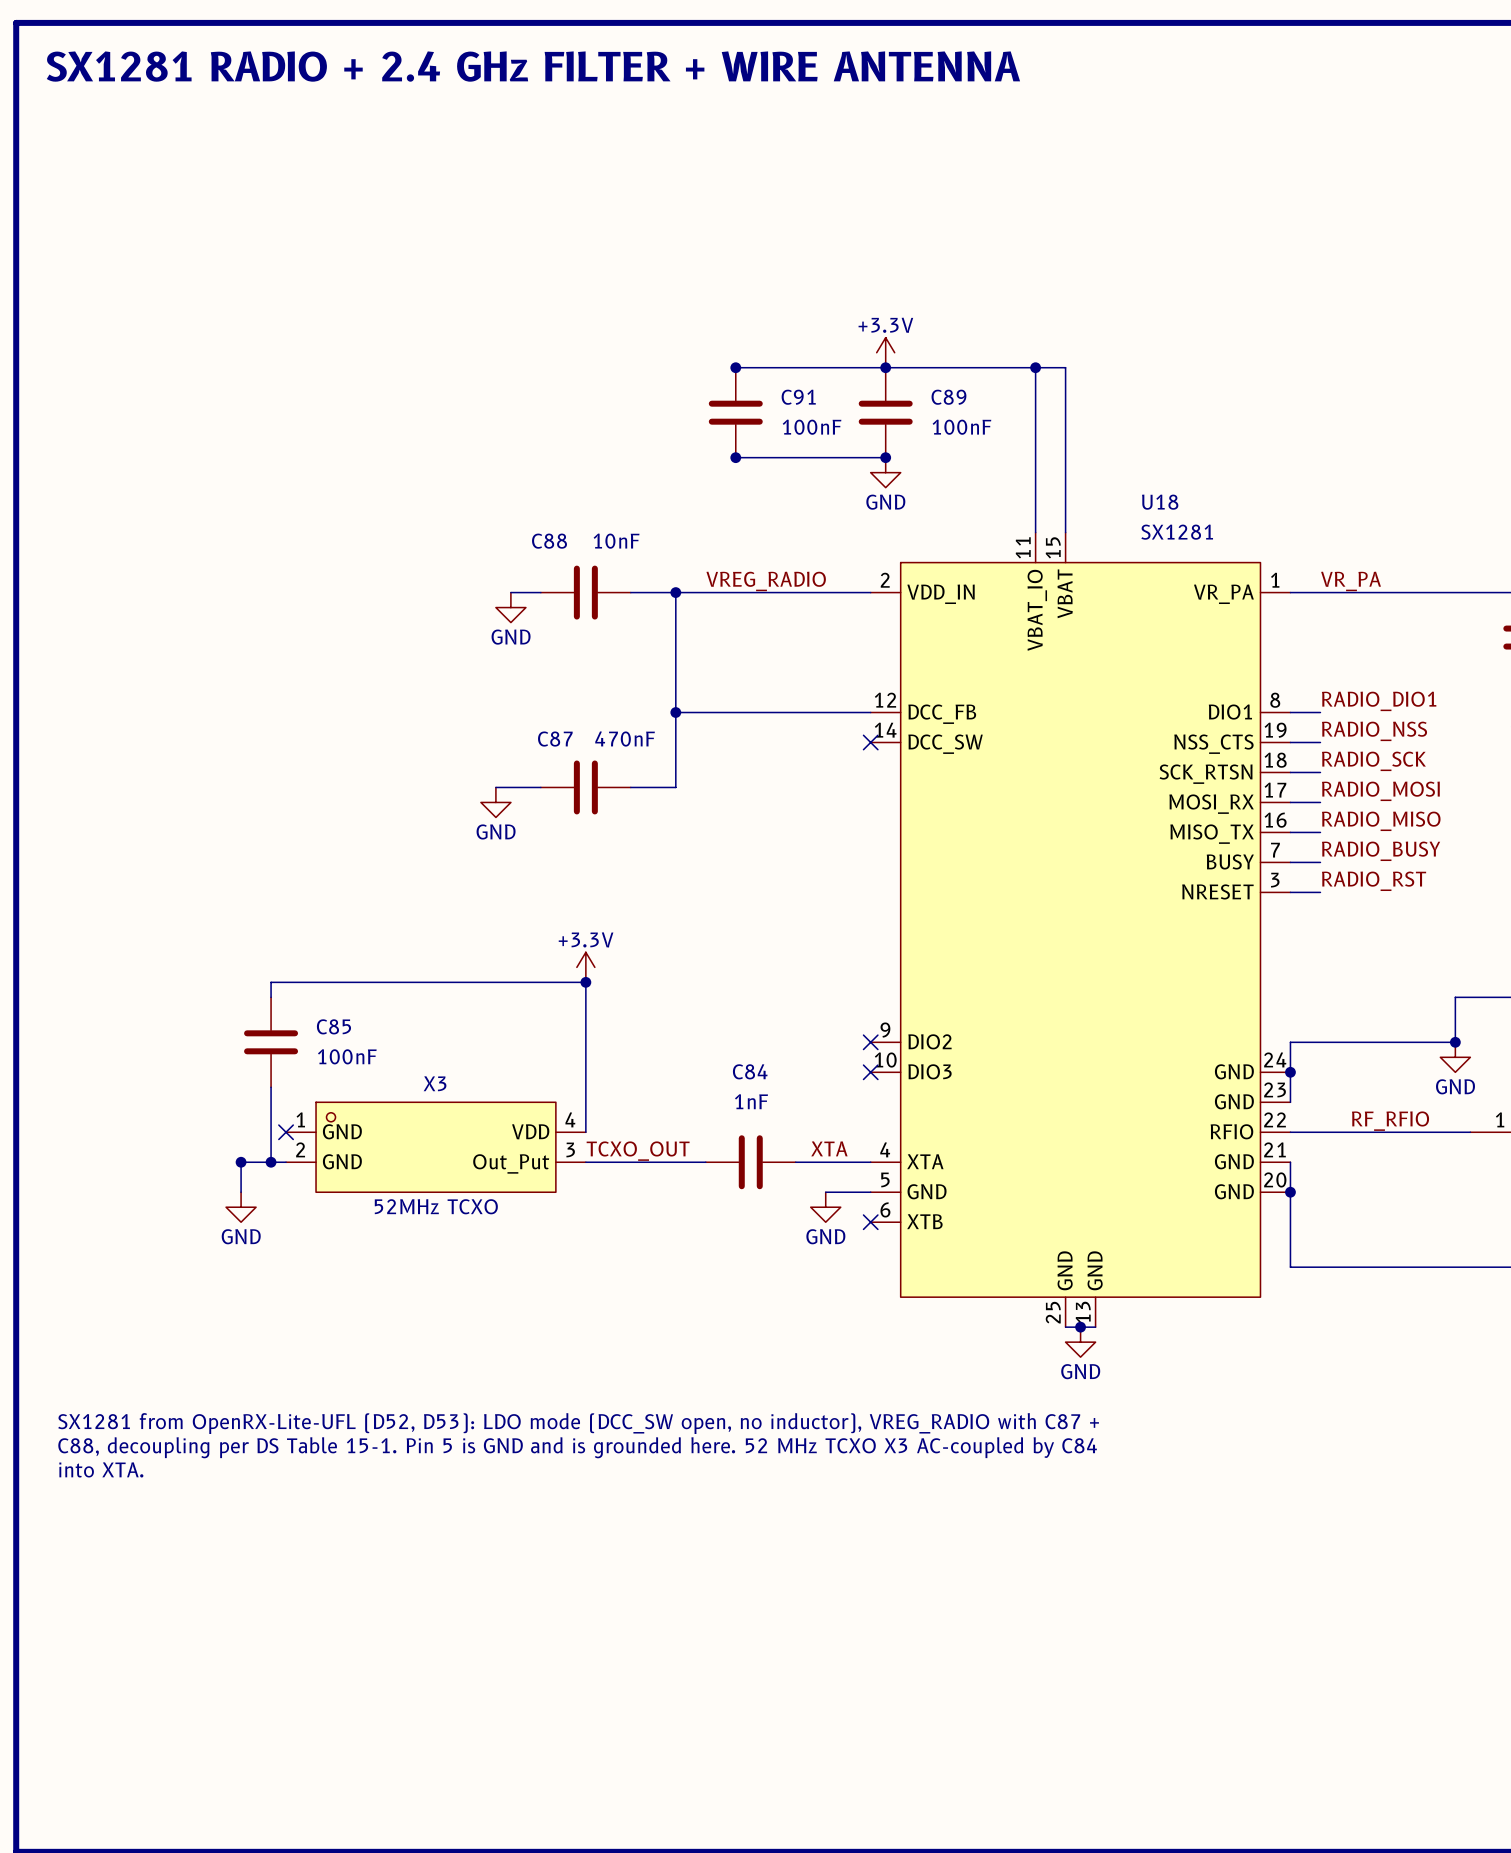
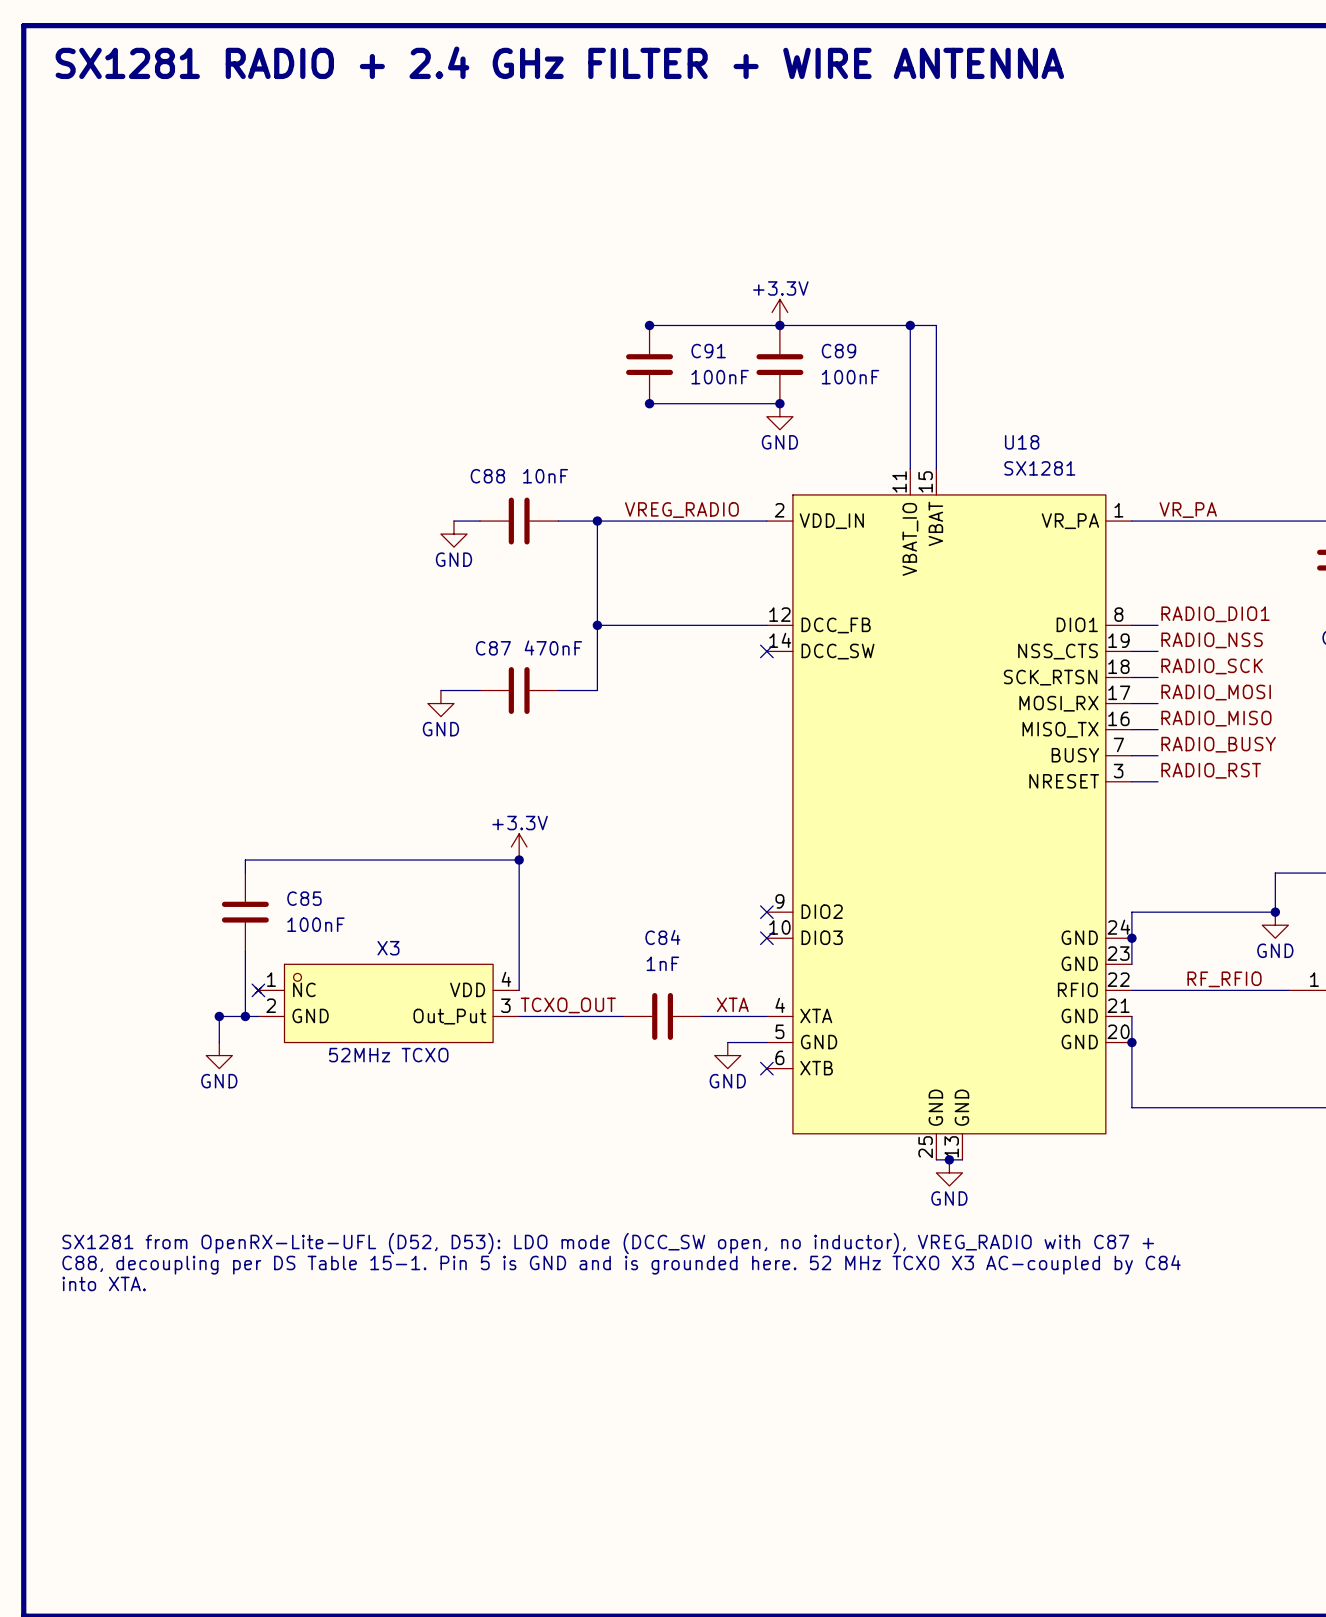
X3 symbol: [286, 1102, 586, 1193] -> [255, 964, 520, 1043]

